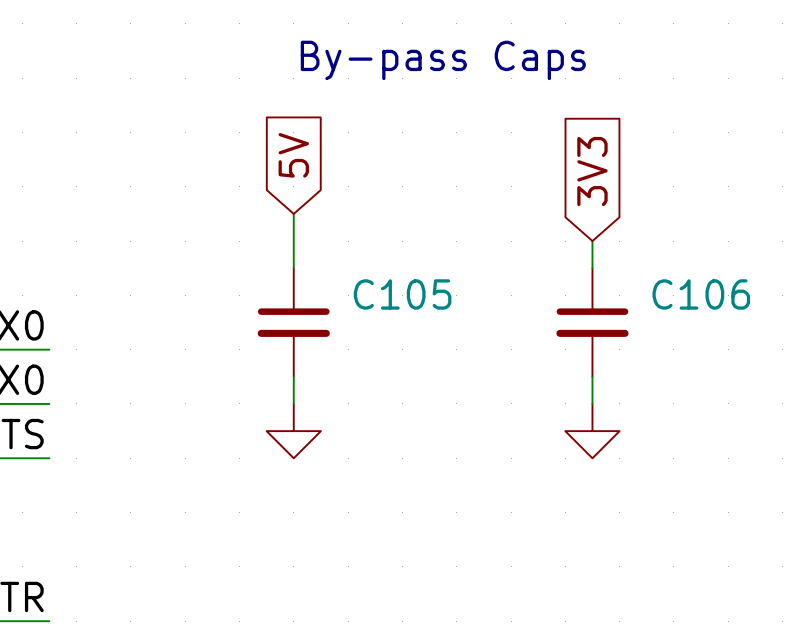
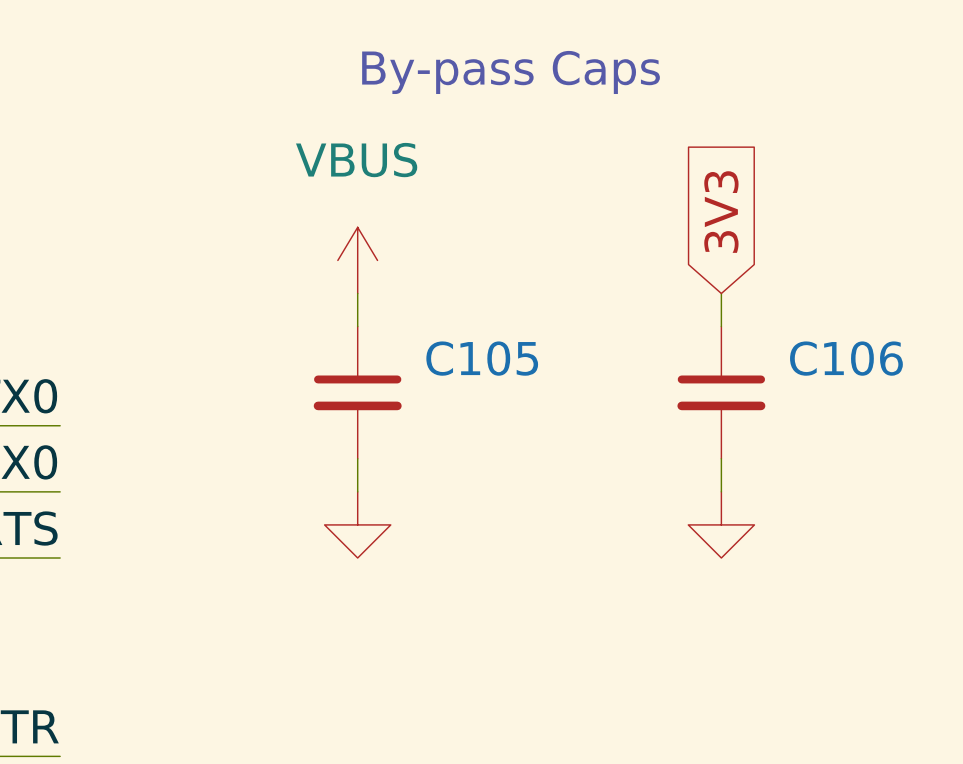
global label: 5V (293, 155) -> none
power symbol: none -> VBUS (357, 260)

